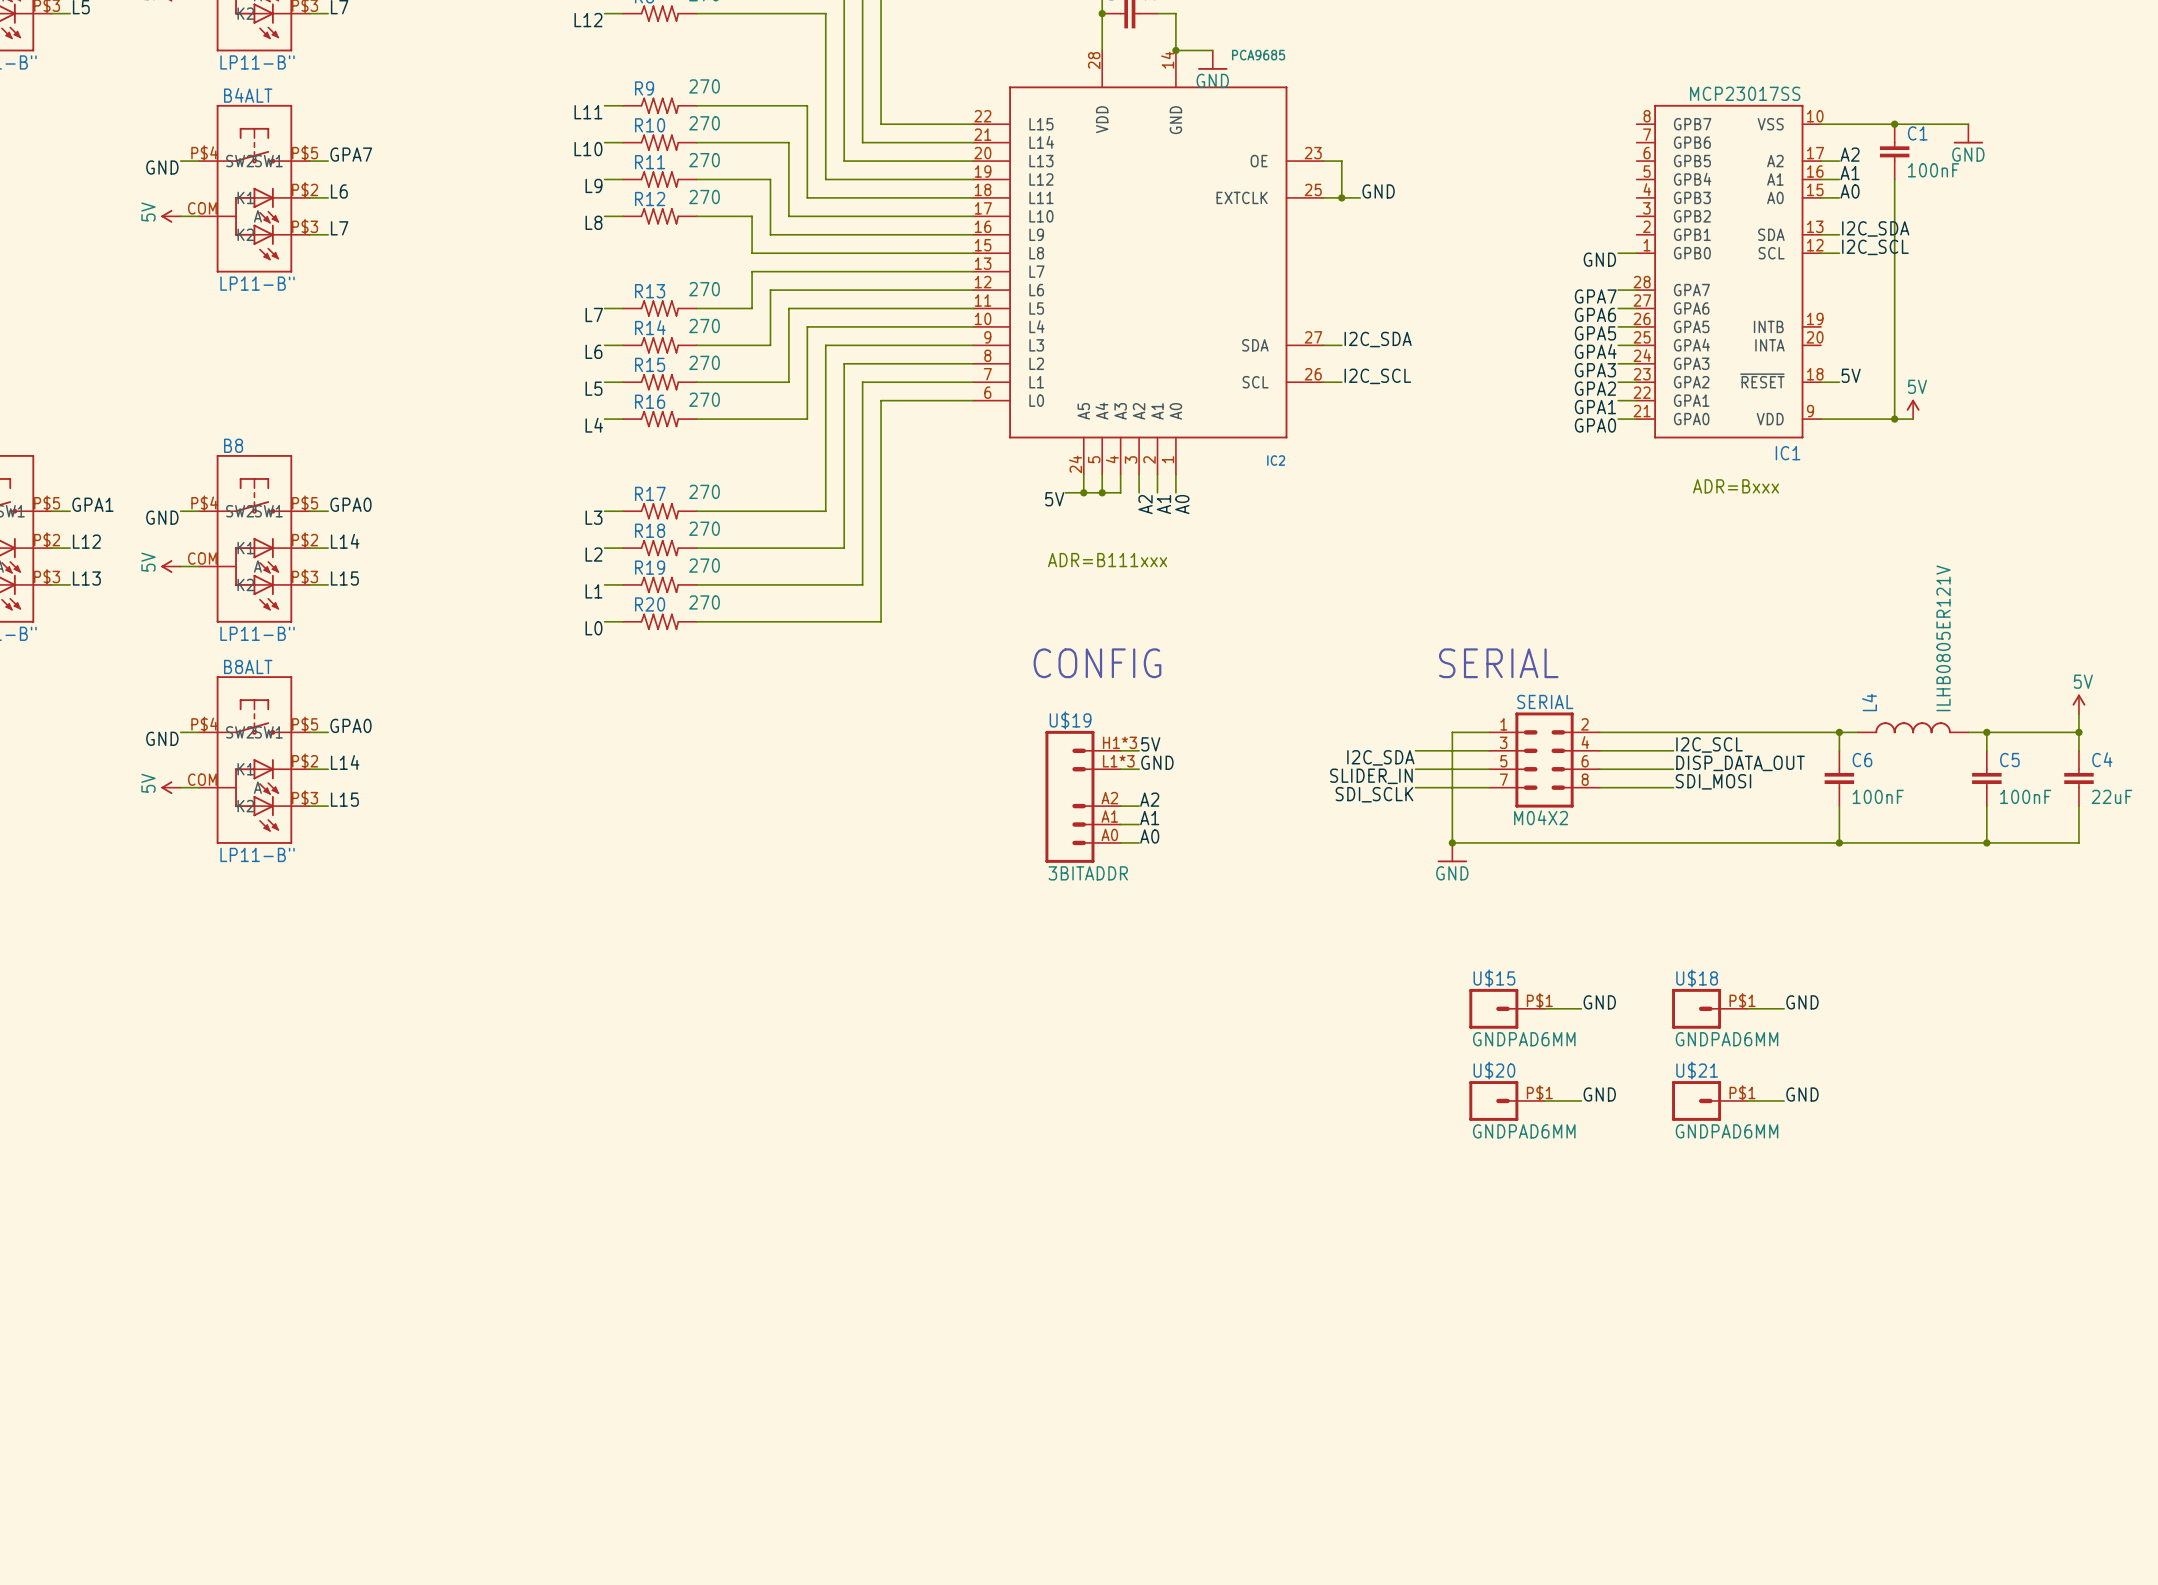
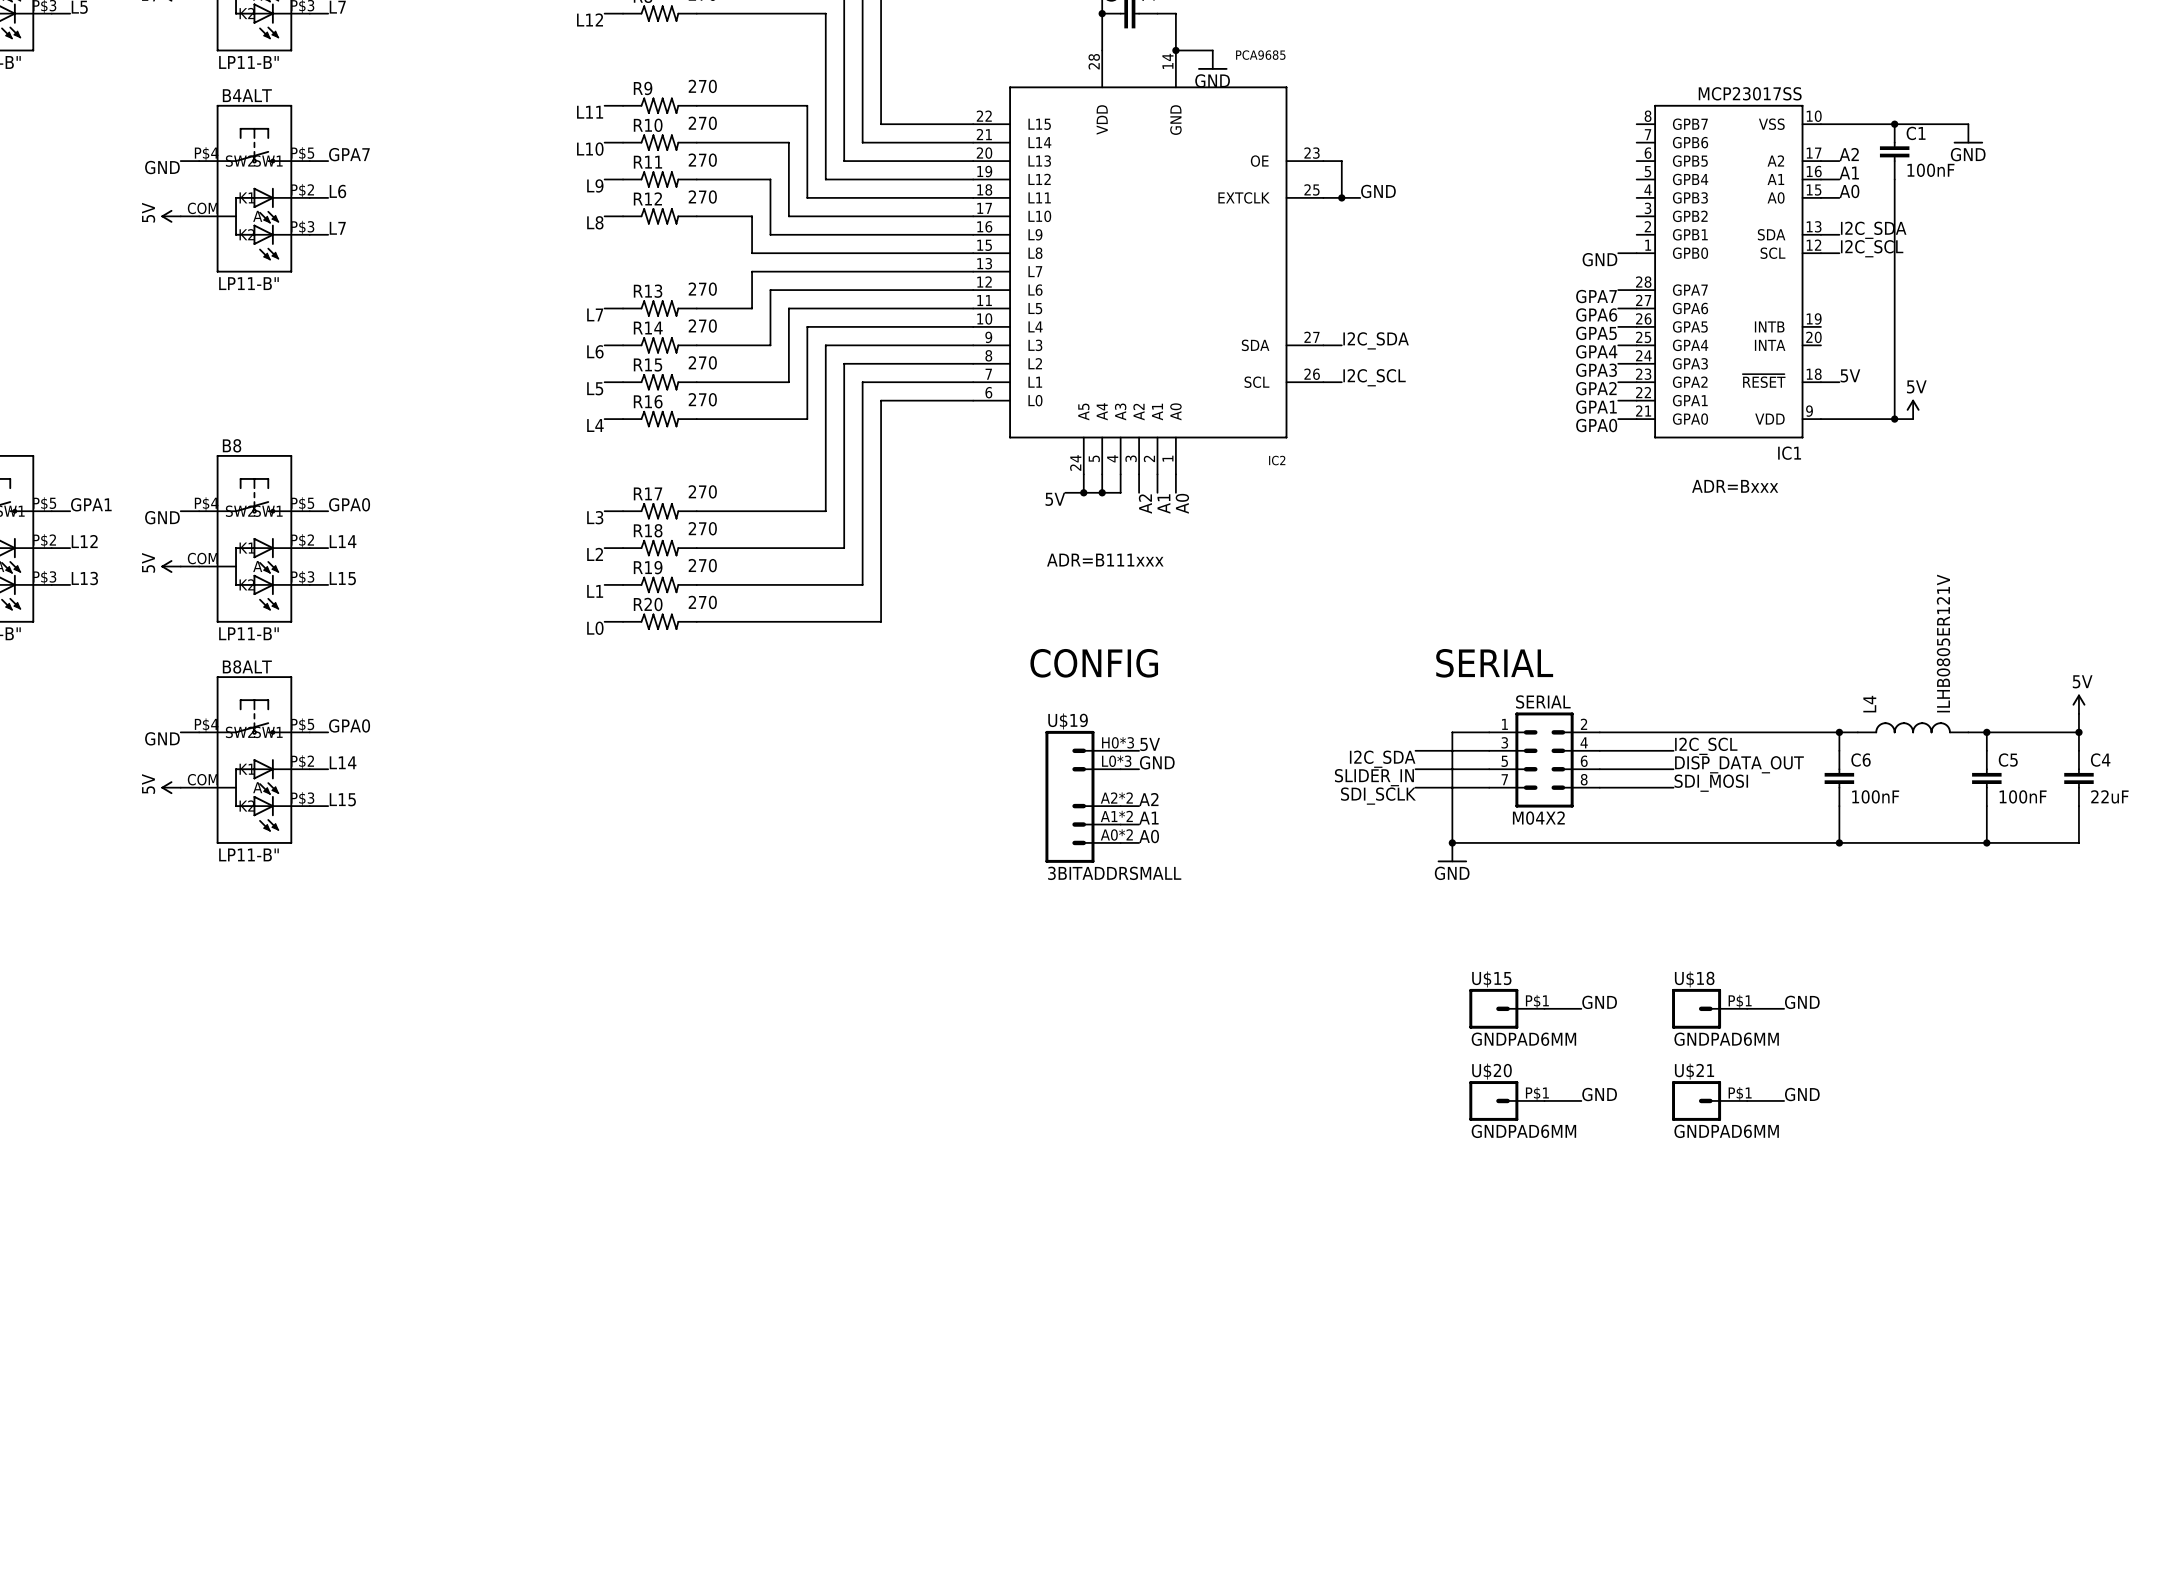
U$19 pin number: H1*3 (1119, 742) -> H0*3 (1118, 742)
U$19 pin number: L1*3 (1118, 761) -> L0*3 (1116, 761)
U$19 pin number: A2 (1109, 798) -> A2*2 (1116, 798)
U$19 pin number: A1 (1109, 816) -> A1*2 (1116, 816)
U$19 pin number: A0 (1109, 834) -> A0*2 (1116, 834)
U$19 value: 3BITADDR (1088, 873) -> 3BITADDRSMALL (1114, 873)

